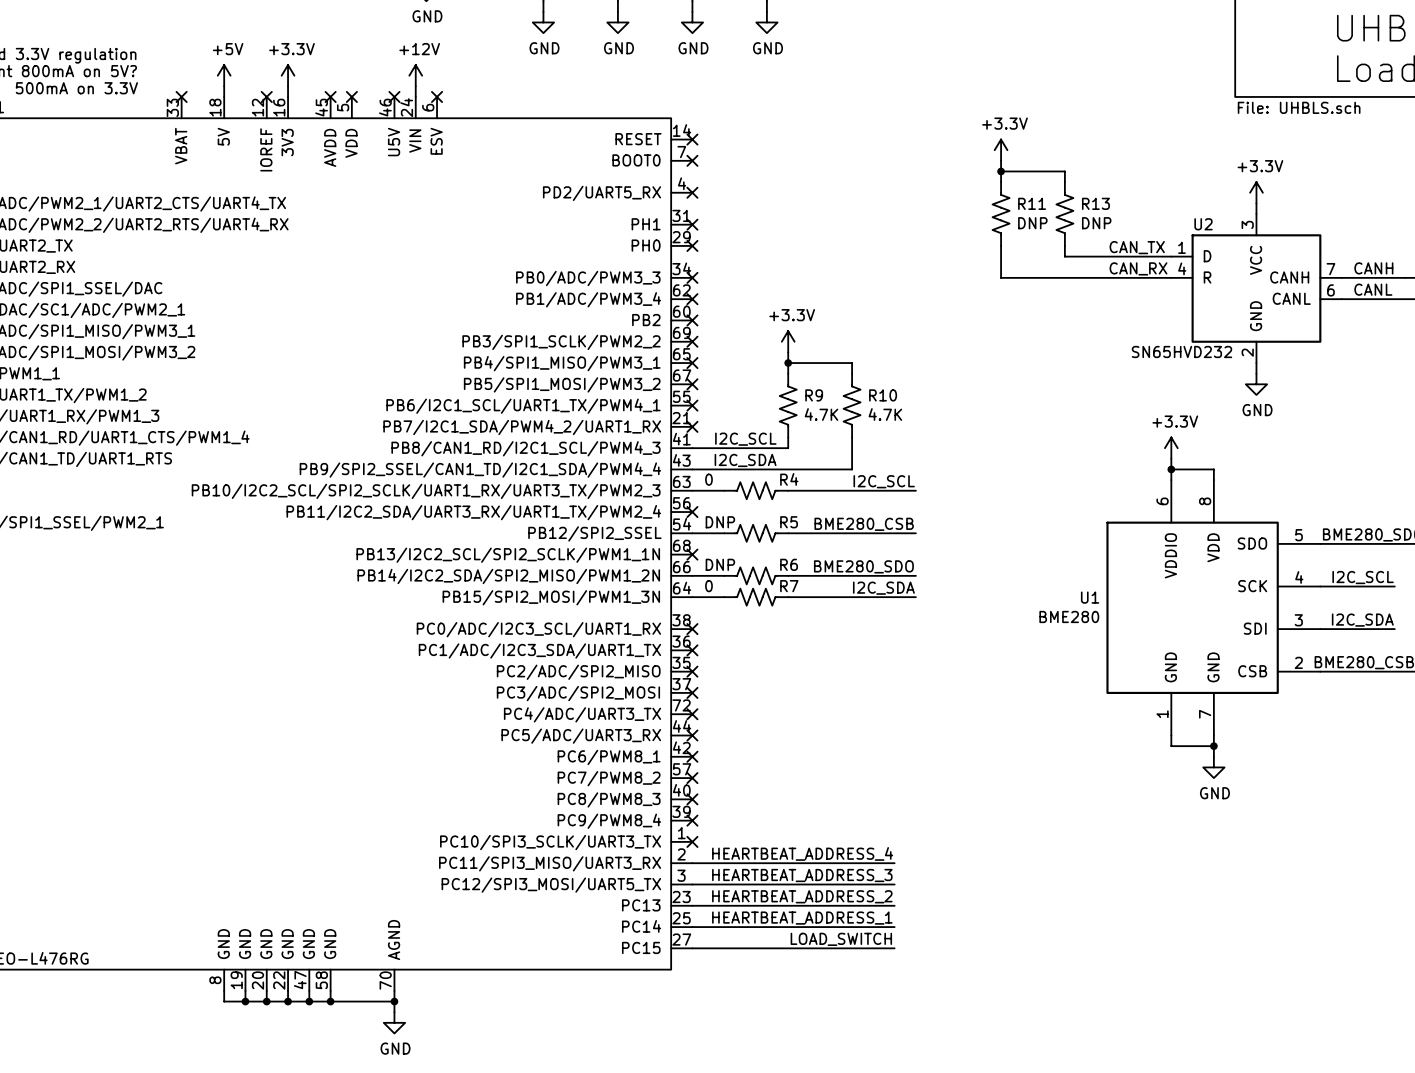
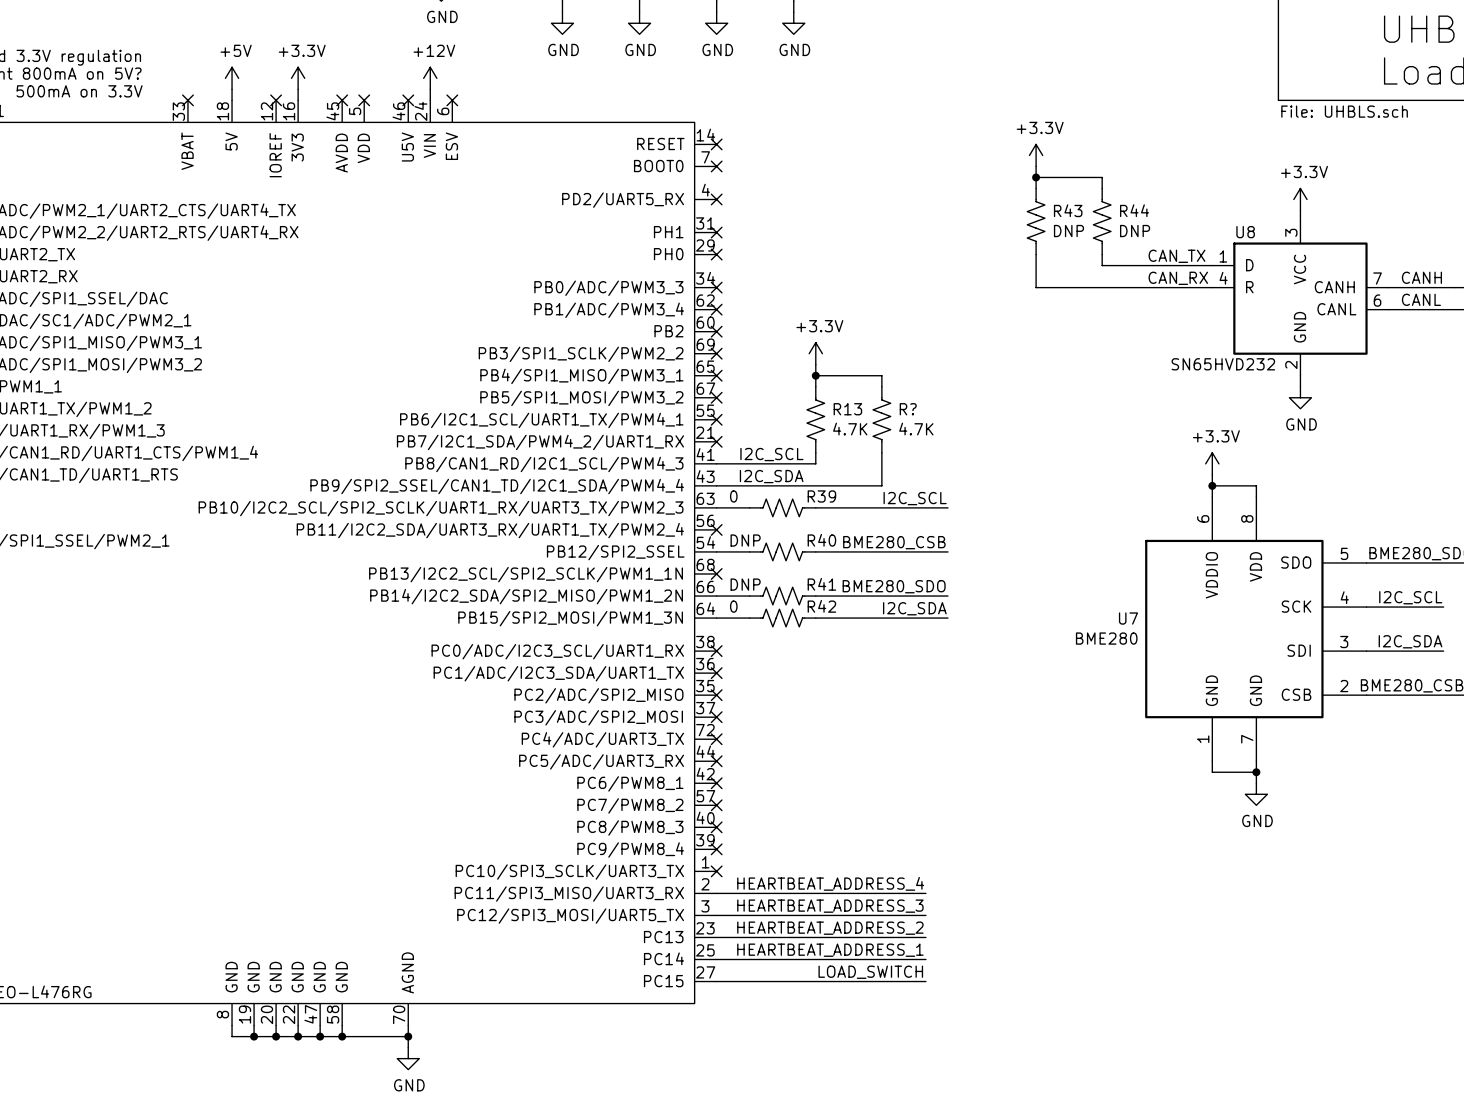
R11 name: R11 (1032, 203) -> R43 (1068, 210)
R13 name: R13 (1095, 203) -> R44 (1134, 210)
U2 name: U2 (1203, 224) -> U8 (1245, 232)
R9 name: R9 (814, 395) -> R13 (847, 409)
R10 name: R10 (883, 395) -> R? (908, 409)
R4 name: R4 (789, 479) -> R39 (821, 496)
R5 name: R5 (789, 522) -> R40 (821, 540)
R6 name: R6 (789, 564) -> R41 (821, 584)
R7 name: R7 (789, 586) -> R42 (821, 606)
U1 name: U1 (1090, 597) -> U7 (1128, 618)

